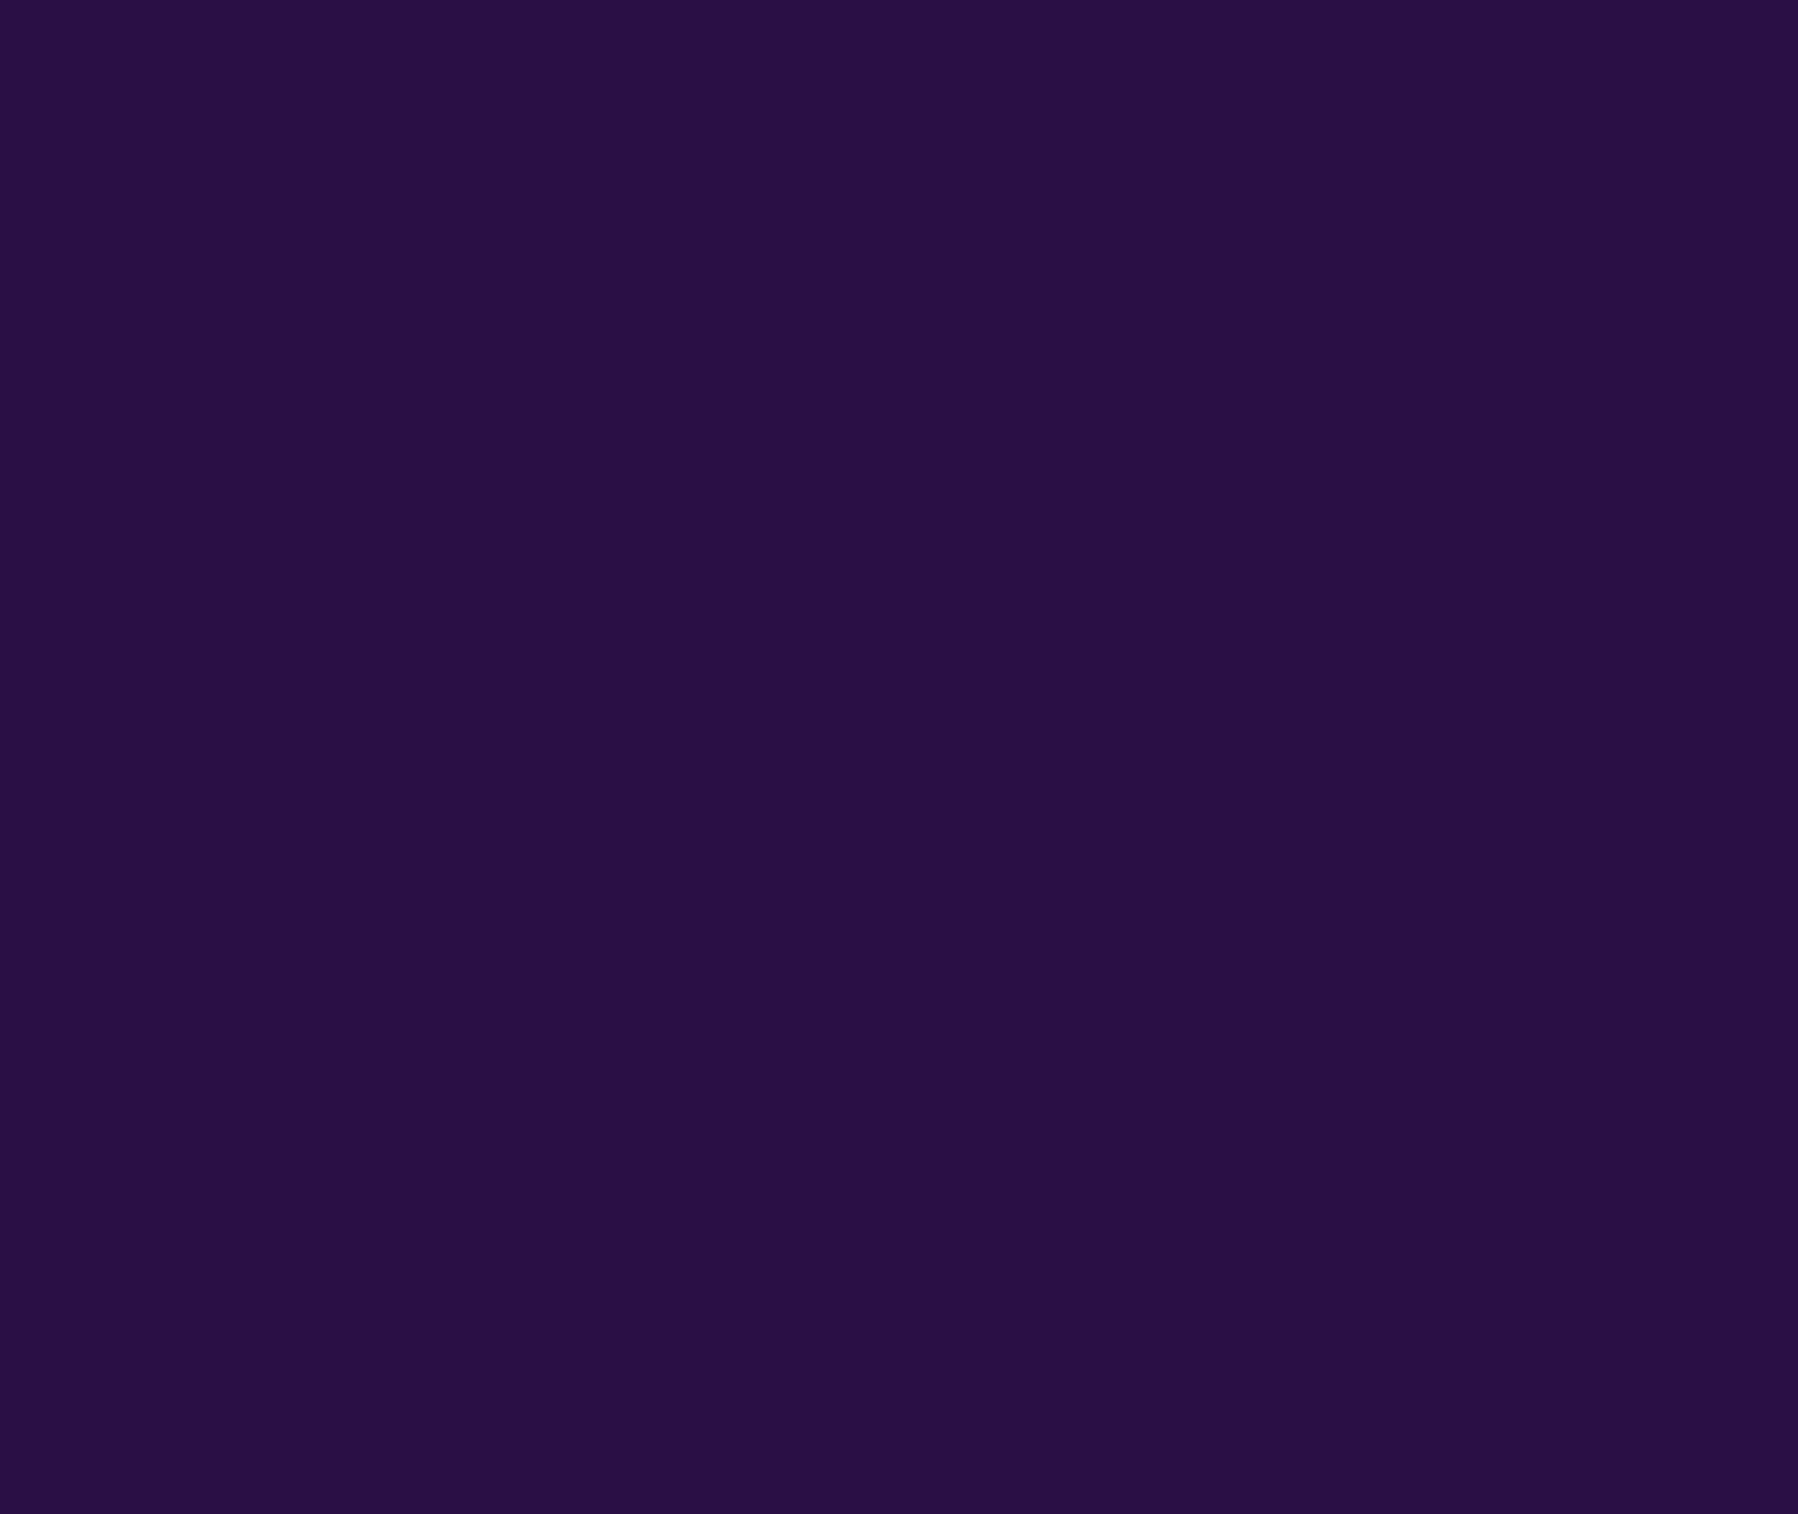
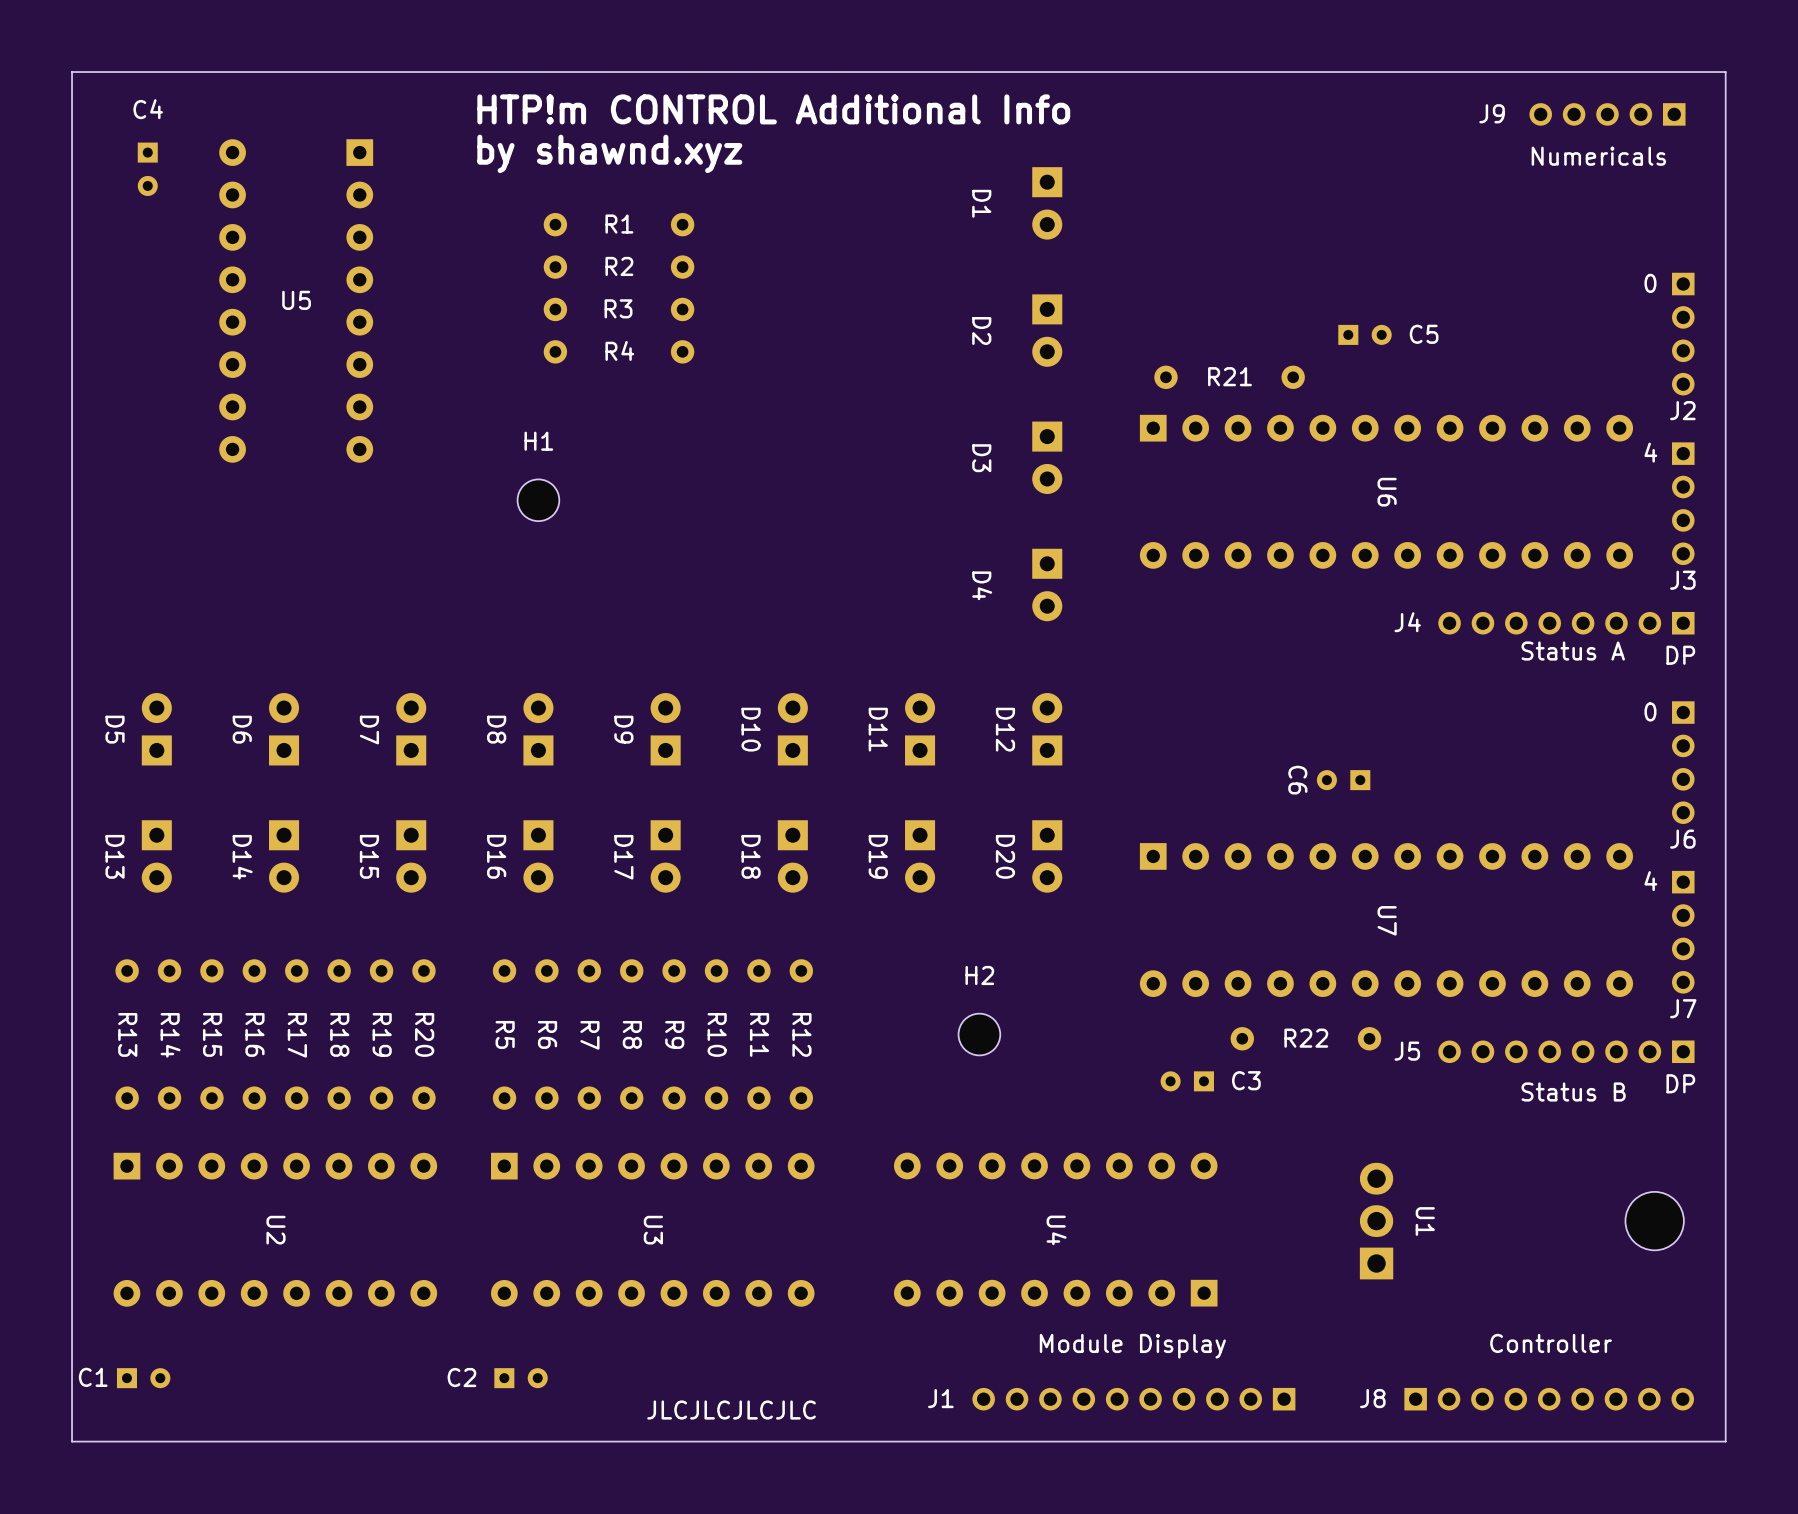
board edge: none -> (1725, 72) (72, 72) (72, 1441) (1725, 1441) (1725, 72)
text: none -> HTP!m CONTROL Additional Info (773, 109)
J9: none -> (1607, 114)
text: none -> by shawnd.xyz (609, 153)
text: none -> Numericals (1598, 156)
C4: none -> (147, 169)
D1: none -> (1047, 203)
R1: none -> (619, 224)
R2: none -> (619, 267)
text: none -> 0 (1650, 283)
U5: none -> (296, 300)
R3: none -> (619, 309)
D2: none -> (1047, 330)
C5: none -> (1365, 334)
J2: none -> (1683, 334)
R4: none -> (619, 351)
R21: none -> (1229, 377)
text: none -> 4 (1650, 452)
D3: none -> (1047, 457)
U6: none -> (1386, 491)
H1: none -> (538, 500)
J3: none -> (1683, 503)
D4: none -> (1047, 584)
J4: none -> (1566, 623)
text: none -> Status A (1573, 651)
text: none -> DP (1680, 655)
text: none -> 0 (1650, 711)
D5: none -> (156, 729)
D6: none -> (284, 729)
D7: none -> (411, 729)
D8: none -> (538, 729)
D9: none -> (665, 729)
D10: none -> (792, 729)
D11: none -> (920, 729)
D12: none -> (1047, 729)
J6: none -> (1683, 762)
C6: none -> (1343, 780)
D13: none -> (156, 856)
D14: none -> (284, 856)
D15: none -> (411, 856)
D16: none -> (538, 856)
D17: none -> (665, 856)
D18: none -> (792, 856)
D19: none -> (920, 856)
D20: none -> (1047, 856)
text: none -> 4 (1650, 881)
U7: none -> (1386, 920)
J7: none -> (1683, 932)
R13: none -> (127, 1034)
R14: none -> (169, 1034)
R15: none -> (211, 1034)
R16: none -> (254, 1034)
R17: none -> (296, 1034)
R18: none -> (339, 1034)
R19: none -> (381, 1034)
R20: none -> (423, 1034)
R5: none -> (504, 1034)
R6: none -> (546, 1034)
R7: none -> (589, 1034)
R8: none -> (631, 1034)
R9: none -> (674, 1034)
R10: none -> (716, 1034)
R11: none -> (758, 1034)
R12: none -> (801, 1034)
H2: none -> (979, 1034)
R22: none -> (1305, 1038)
J5: none -> (1566, 1051)
C3: none -> (1187, 1081)
text: none -> DP (1680, 1083)
text: none -> Status B (1573, 1091)
U1: none -> (1521, 1221)
U2: none -> (275, 1229)
U3: none -> (652, 1229)
U4: none -> (1055, 1229)
text: none -> Controller (1551, 1343)
text: none -> Module Display (1132, 1346)
C1: none -> (143, 1378)
C2: none -> (521, 1378)
J1: none -> (1133, 1399)
J8: none -> (1549, 1399)
text: none -> JLCJLCJLCJLC (731, 1410)

